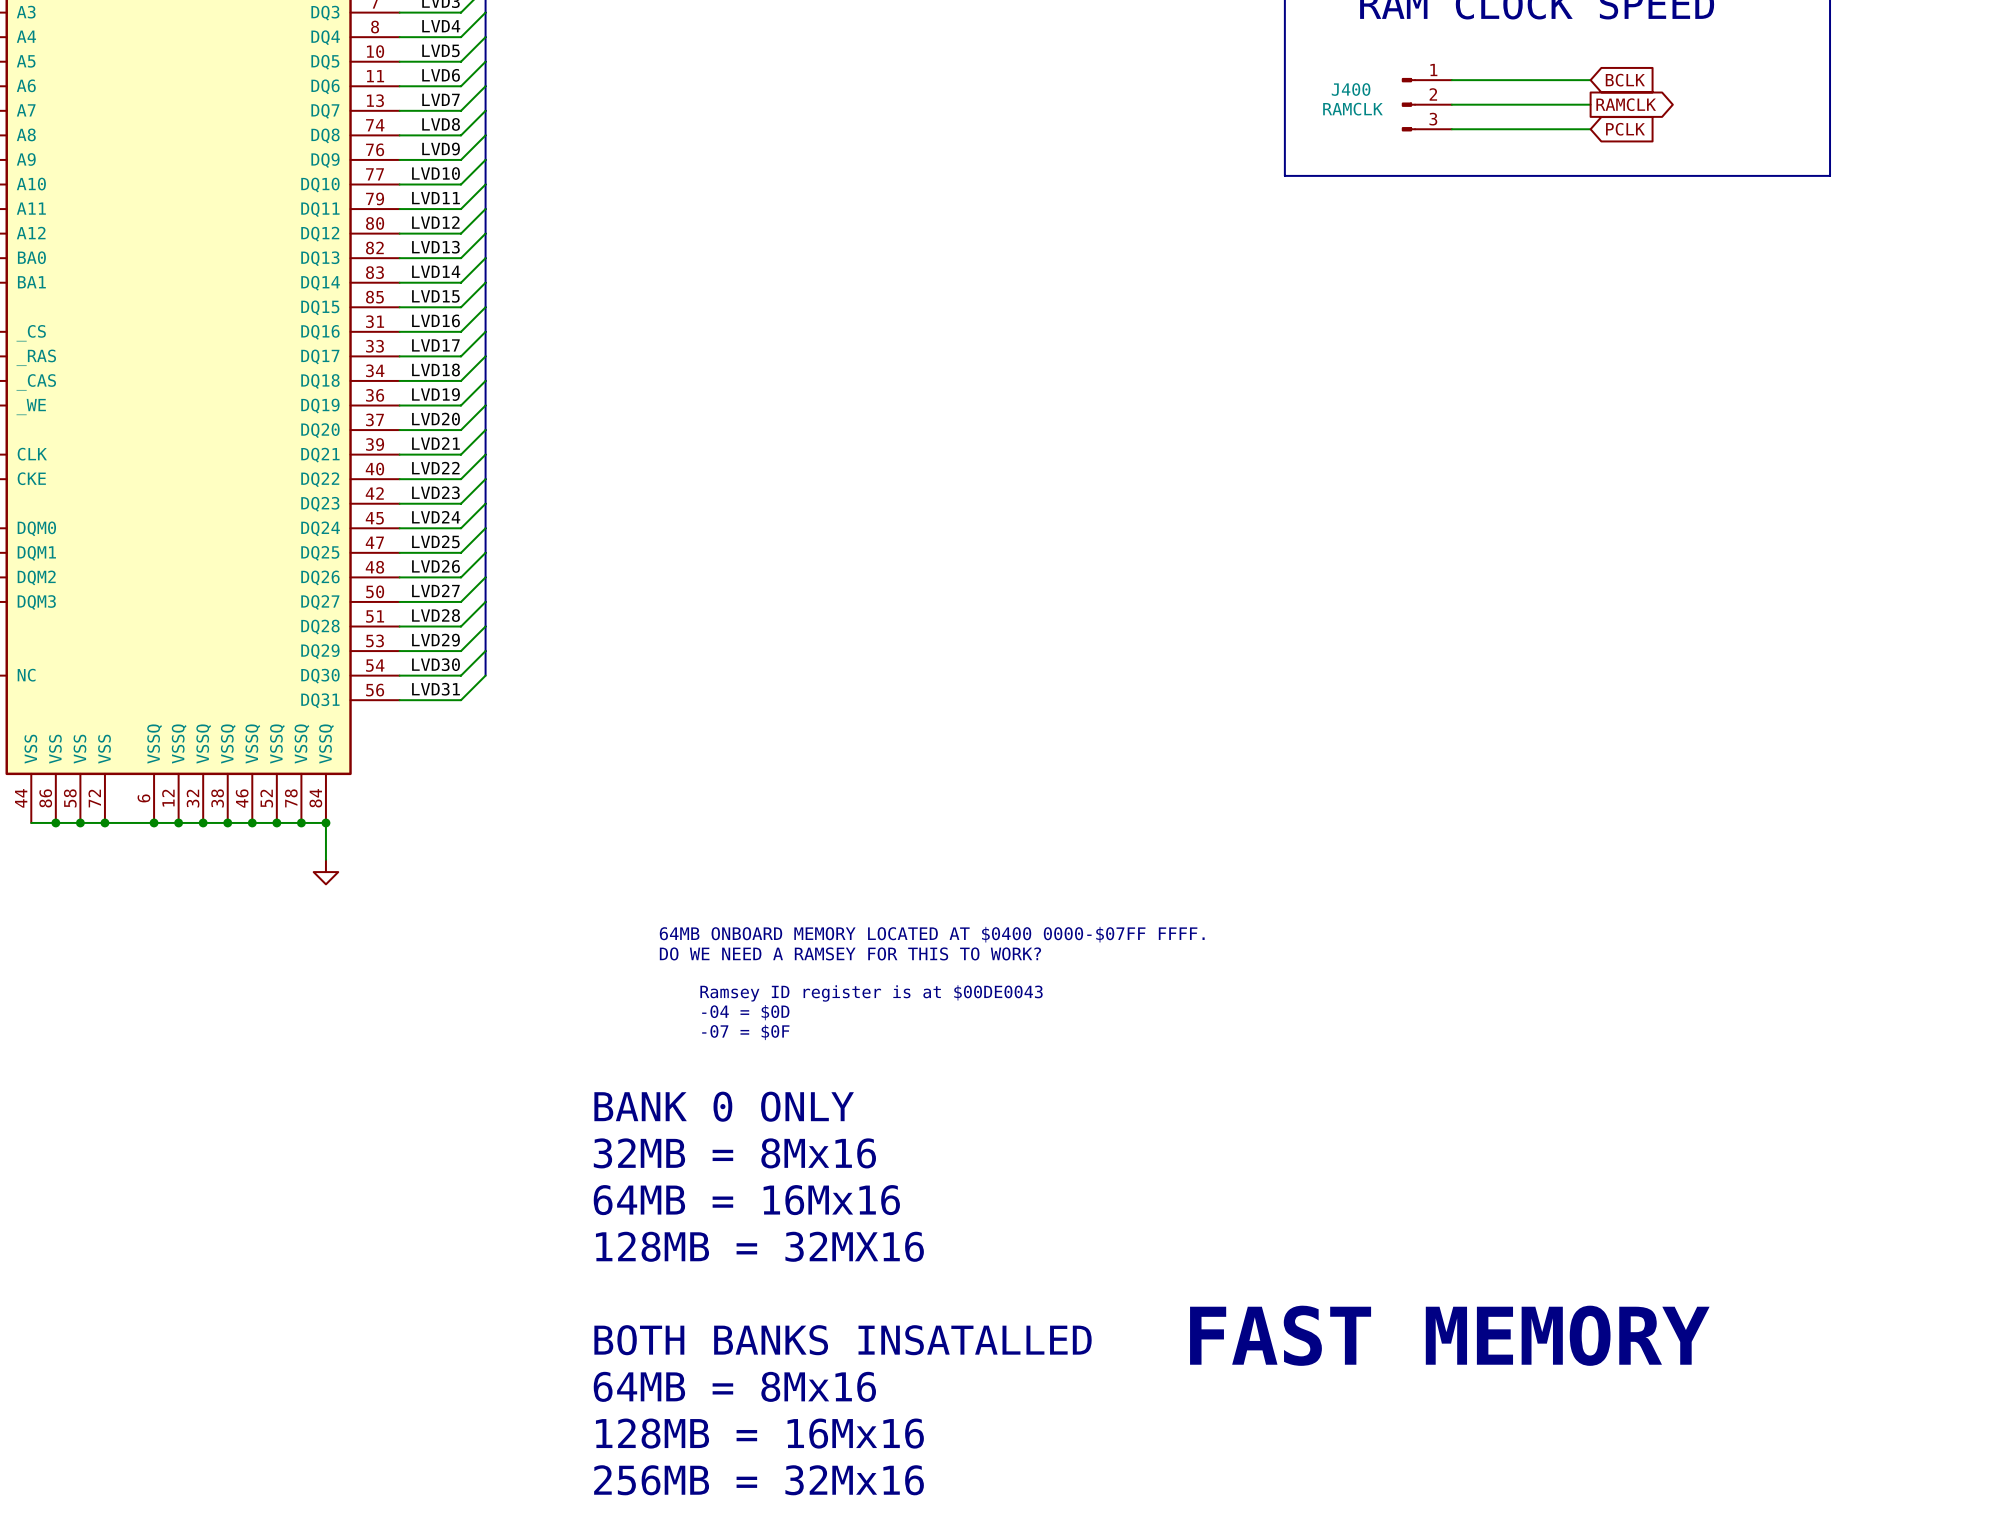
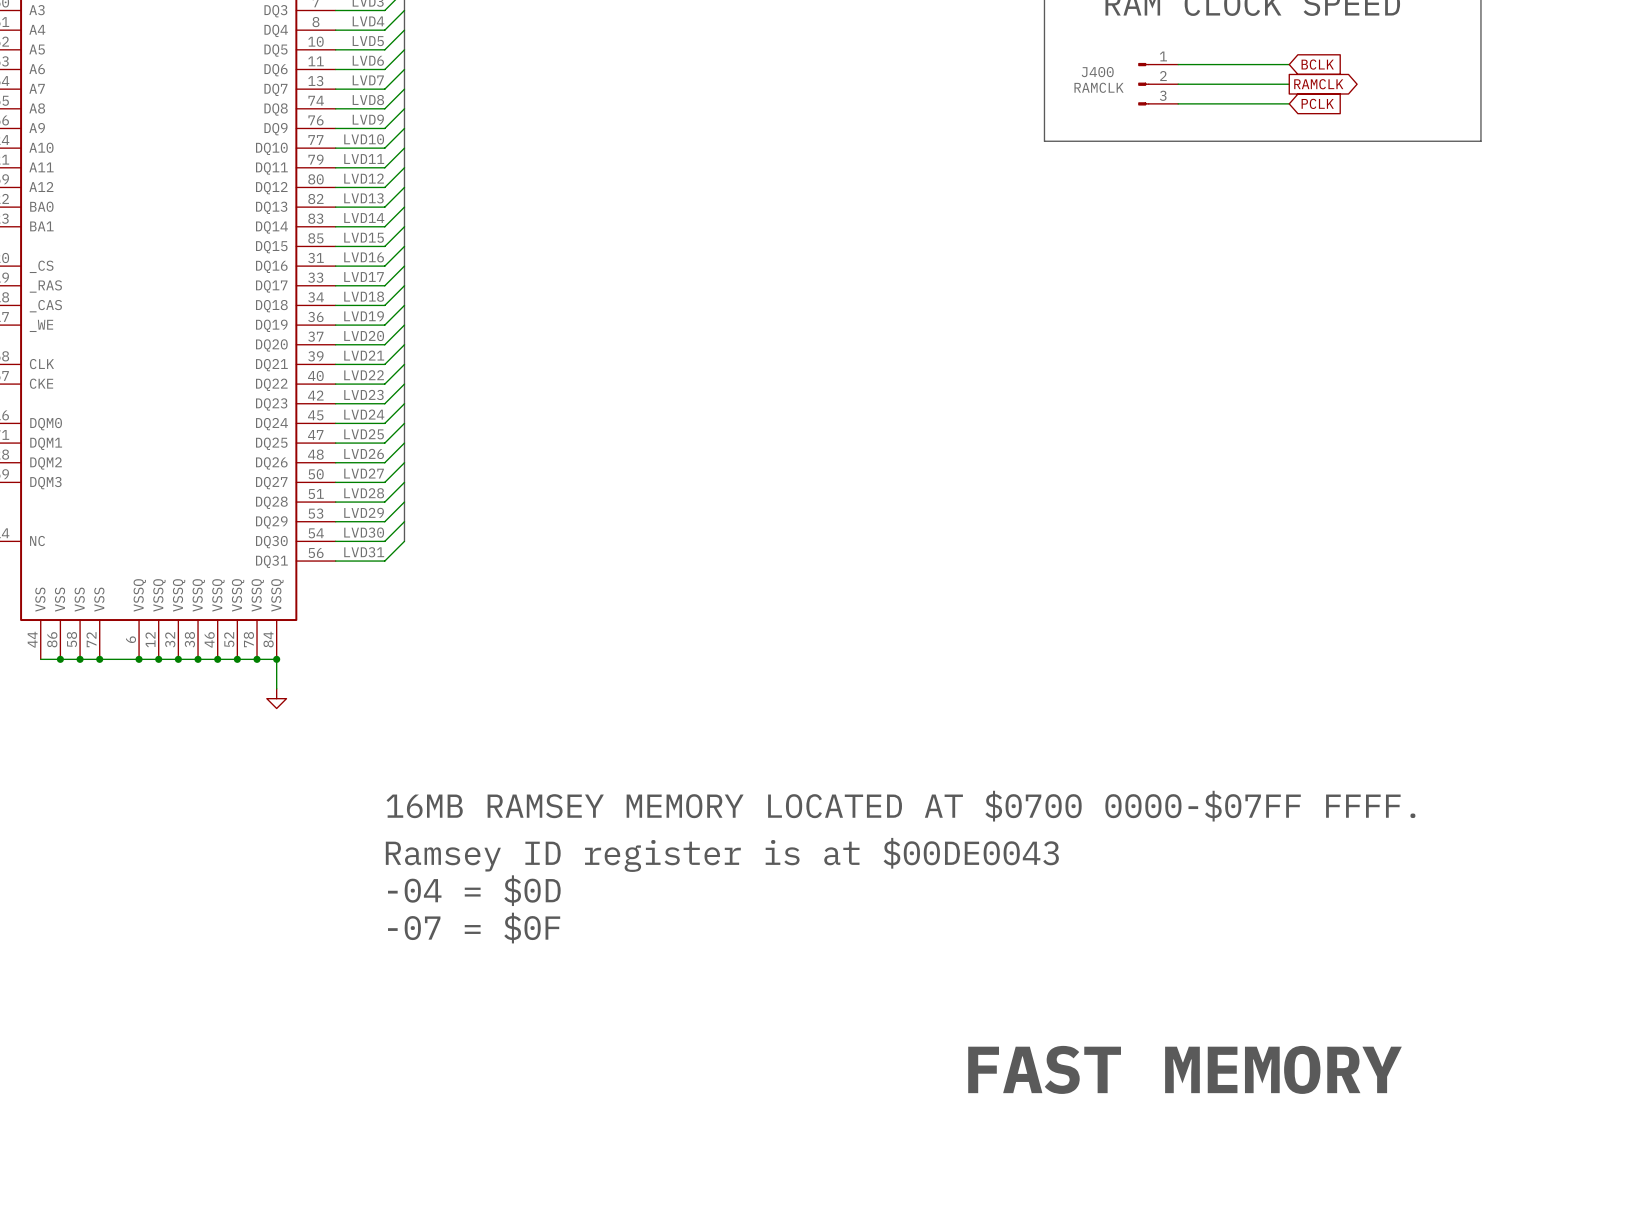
text: 64MB ONBOARD MEMORY LOCATED AT $0400 0000-$07FF FFFF. (932, 934) -> none
text: DO WE NEED A RAMSEY FOR THIS TO WORK? (850, 953) -> none
text: Ramsey ID register is at $00DE0043 (871, 993) -> none
text: none -> 16MB RAMSEY MEMORY LOCATED AT $0700 0000-$07FF FFFF. (900, 806)
text: -04 = $0D (745, 1012) -> none
text: -07 = $0F (745, 1032) -> none
text: none -> Ramsey ID register is at $00DE0043 (722, 854)
text: BANK 0 ONLY (724, 1106) -> none
text: none -> -04 = $0D (474, 890)
text: 32MB = 8Mx16 (734, 1153) -> none
text: none -> -07 = $0F (474, 928)
text: 64MB = 16Mx16 (746, 1200) -> none
text: 128MB = 32MX16 (759, 1246) -> none
text: BOTH BANKS INSATALLED (843, 1340) -> none
text: 64MB = 8Mx16 (734, 1386) -> none
text: 128MB = 16Mx16 (759, 1433) -> none
text: 256MB = 32Mx16 (759, 1480) -> none

